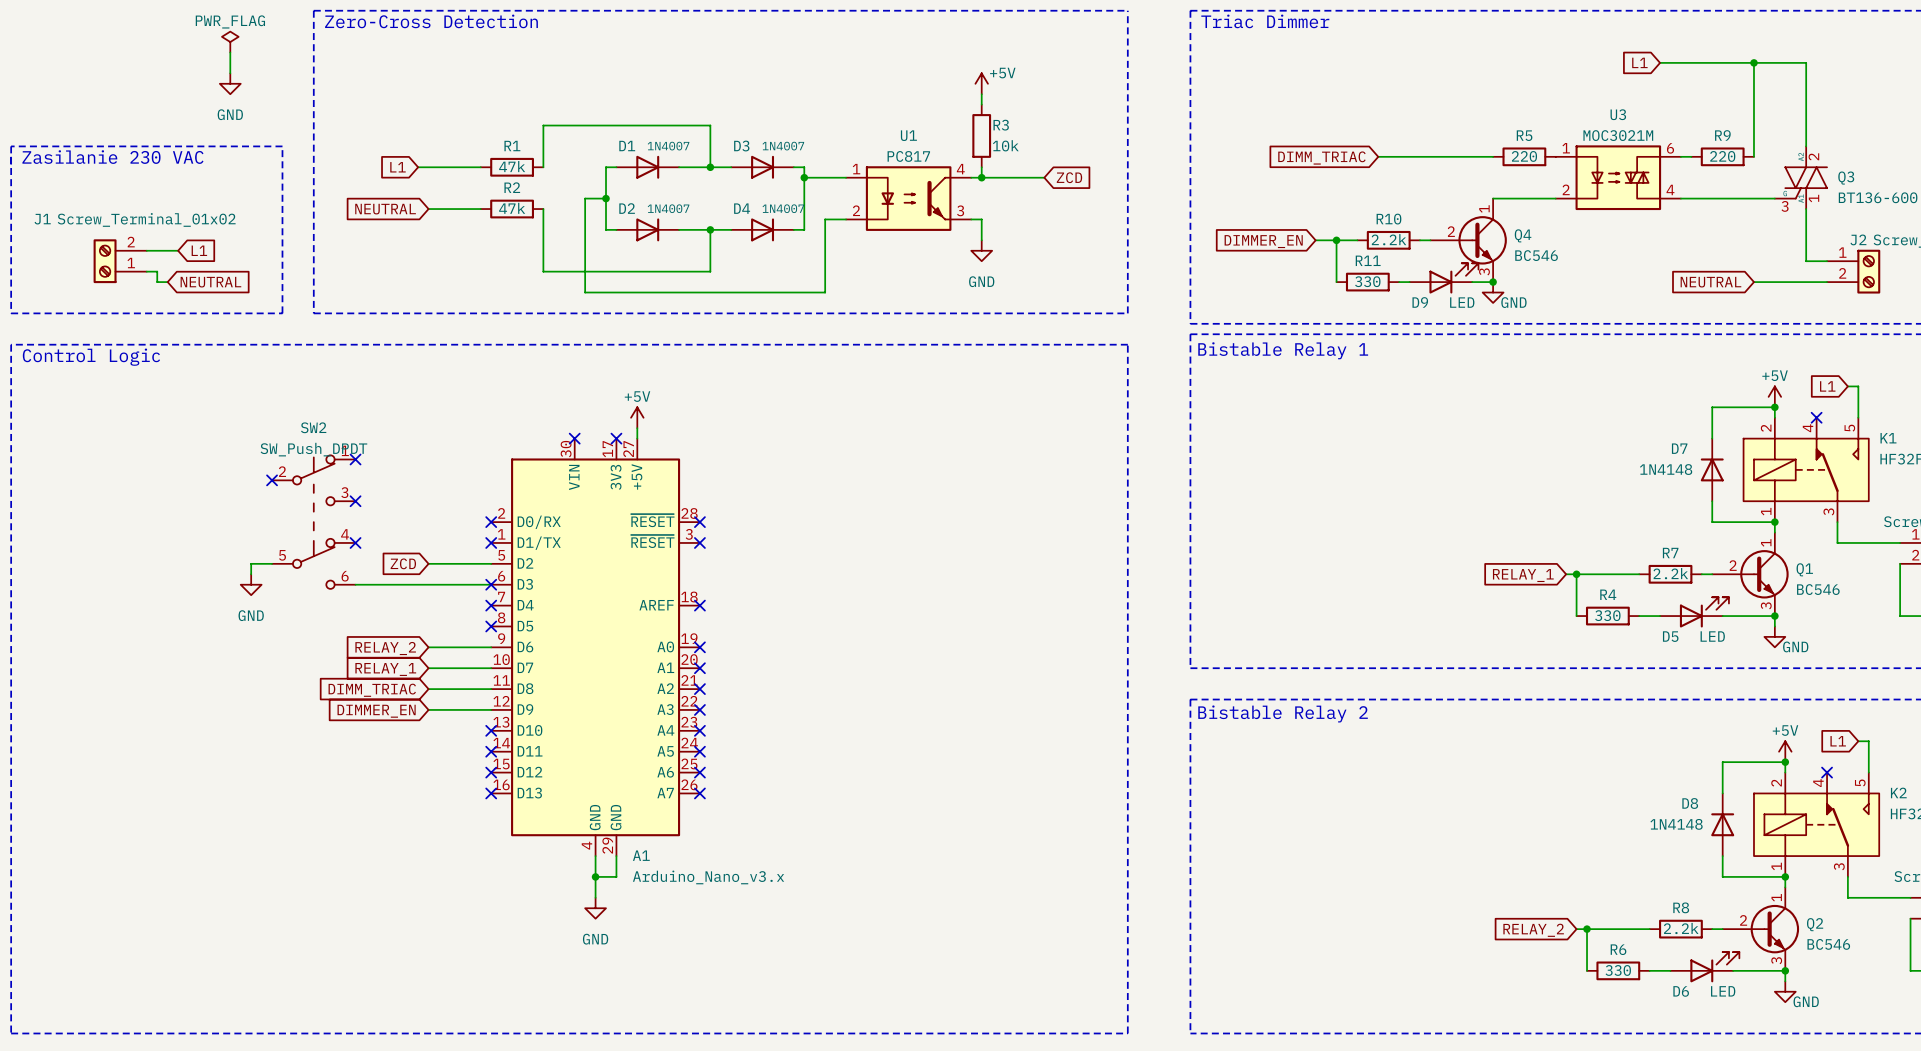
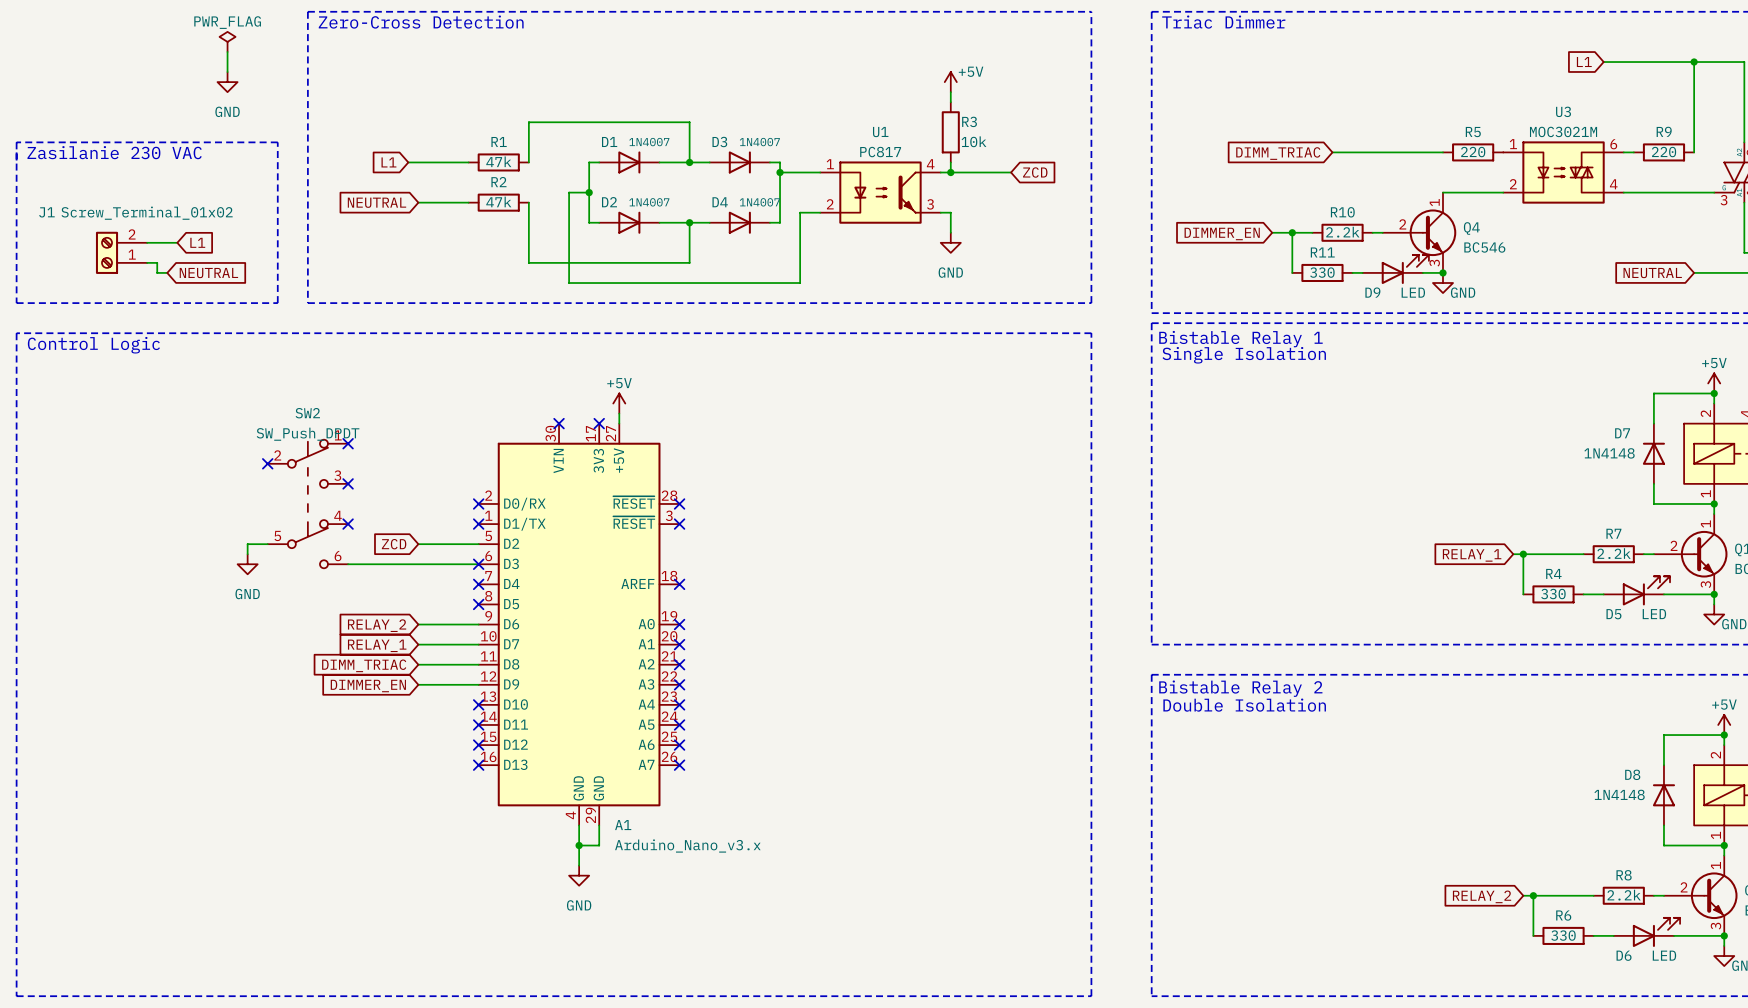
text: none -> Single Isolation (1244, 355)
text: none -> Double Isolation (1244, 705)

